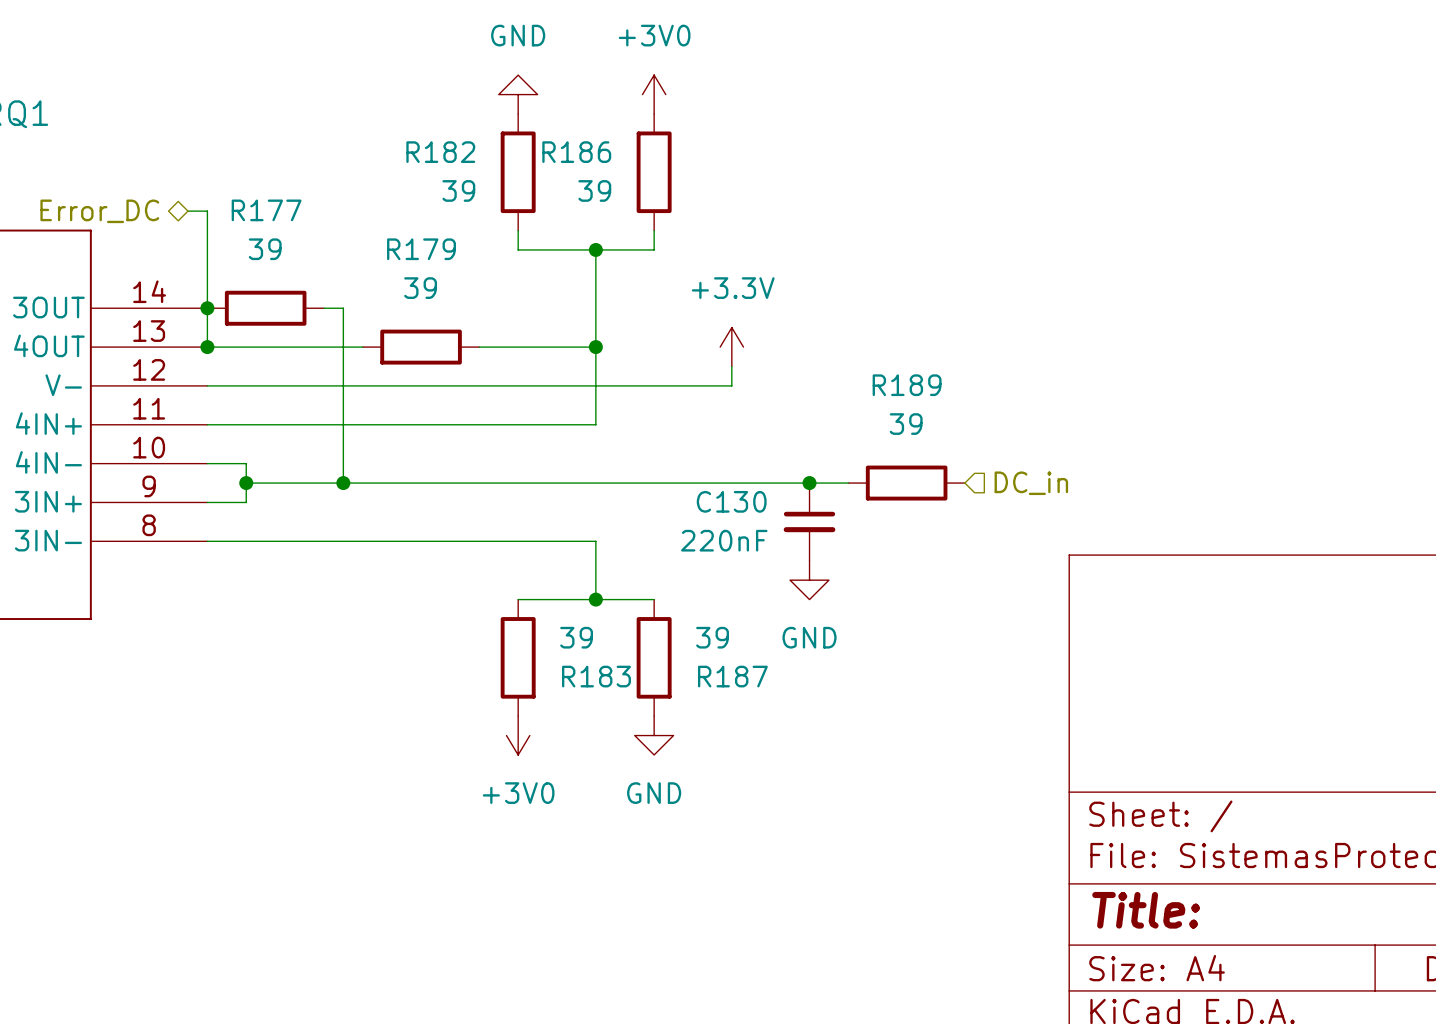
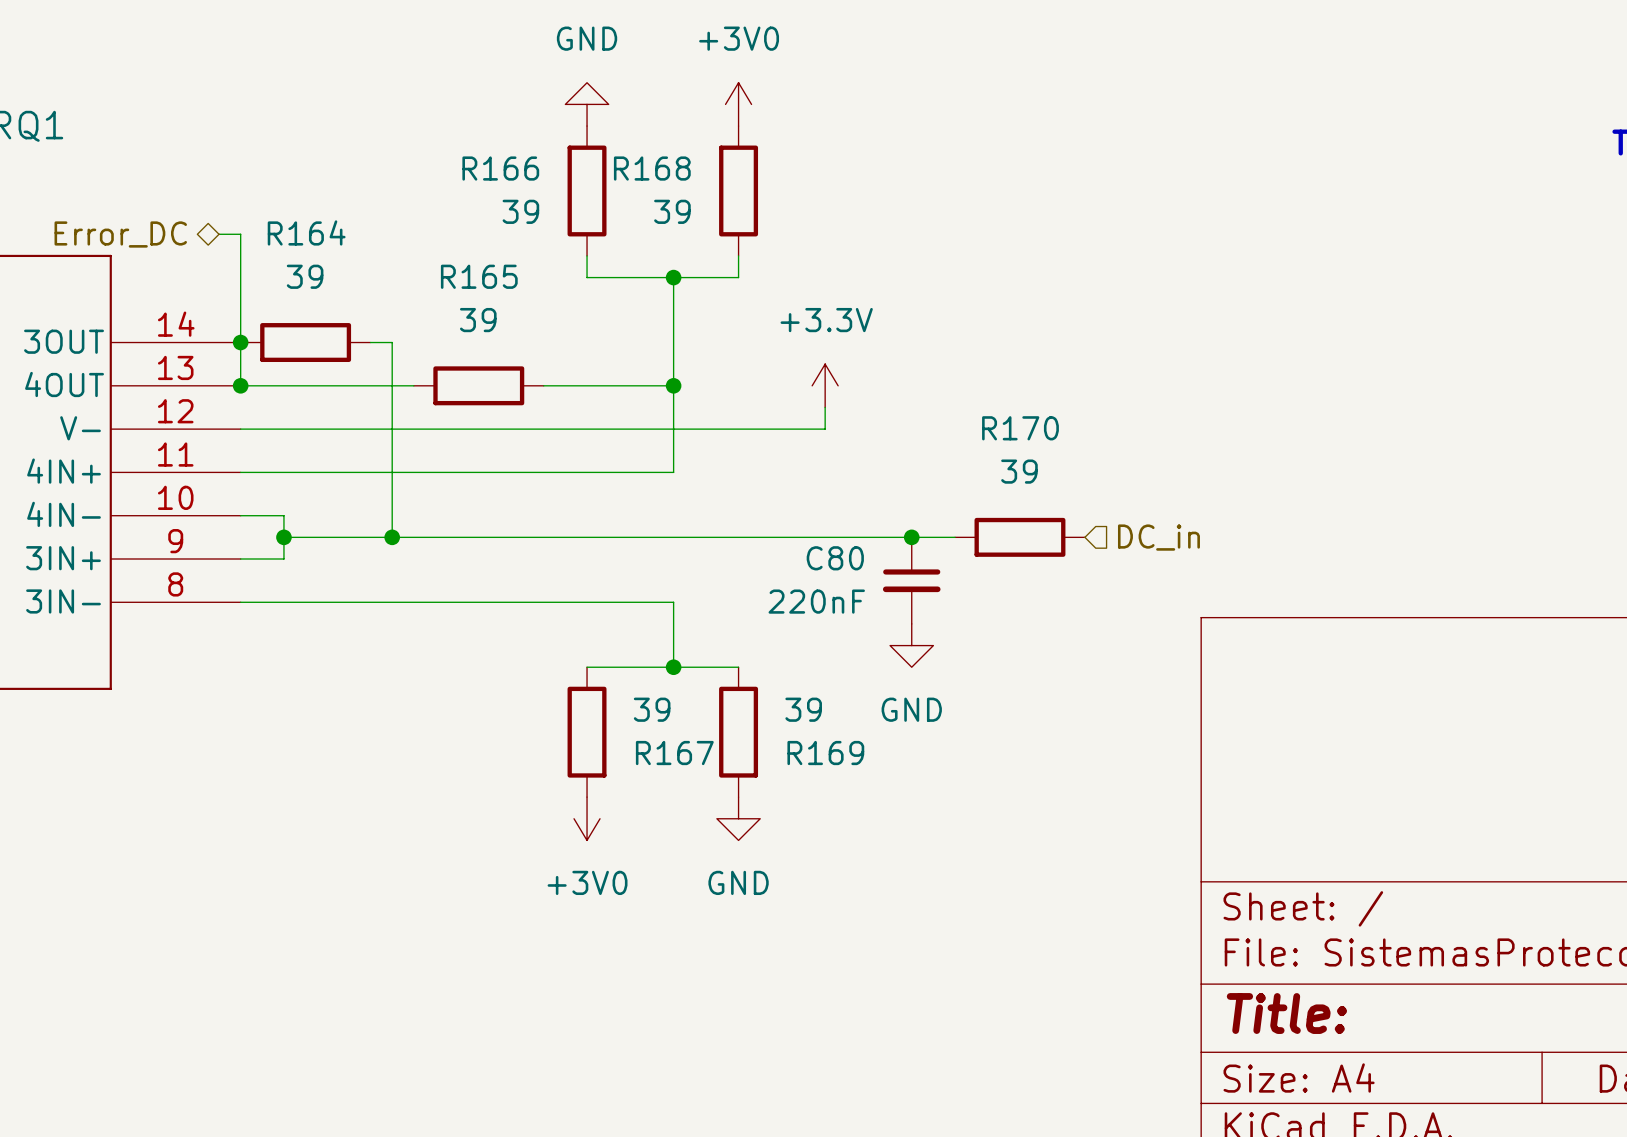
R182 name: R182 (440, 152) -> R166 (500, 168)
R186 name: R186 (576, 152) -> R168 (652, 168)
R177 name: R177 (266, 210) -> R164 (306, 232)
R179 name: R179 (421, 249) -> R165 (479, 276)
R189 name: R189 (907, 385) -> R170 (1020, 428)
C130 name: C130 (731, 501) -> C80 (835, 558)
R183 name: R183 (596, 676) -> R167 (674, 753)
R187 name: R187 (732, 676) -> R169 (825, 753)

